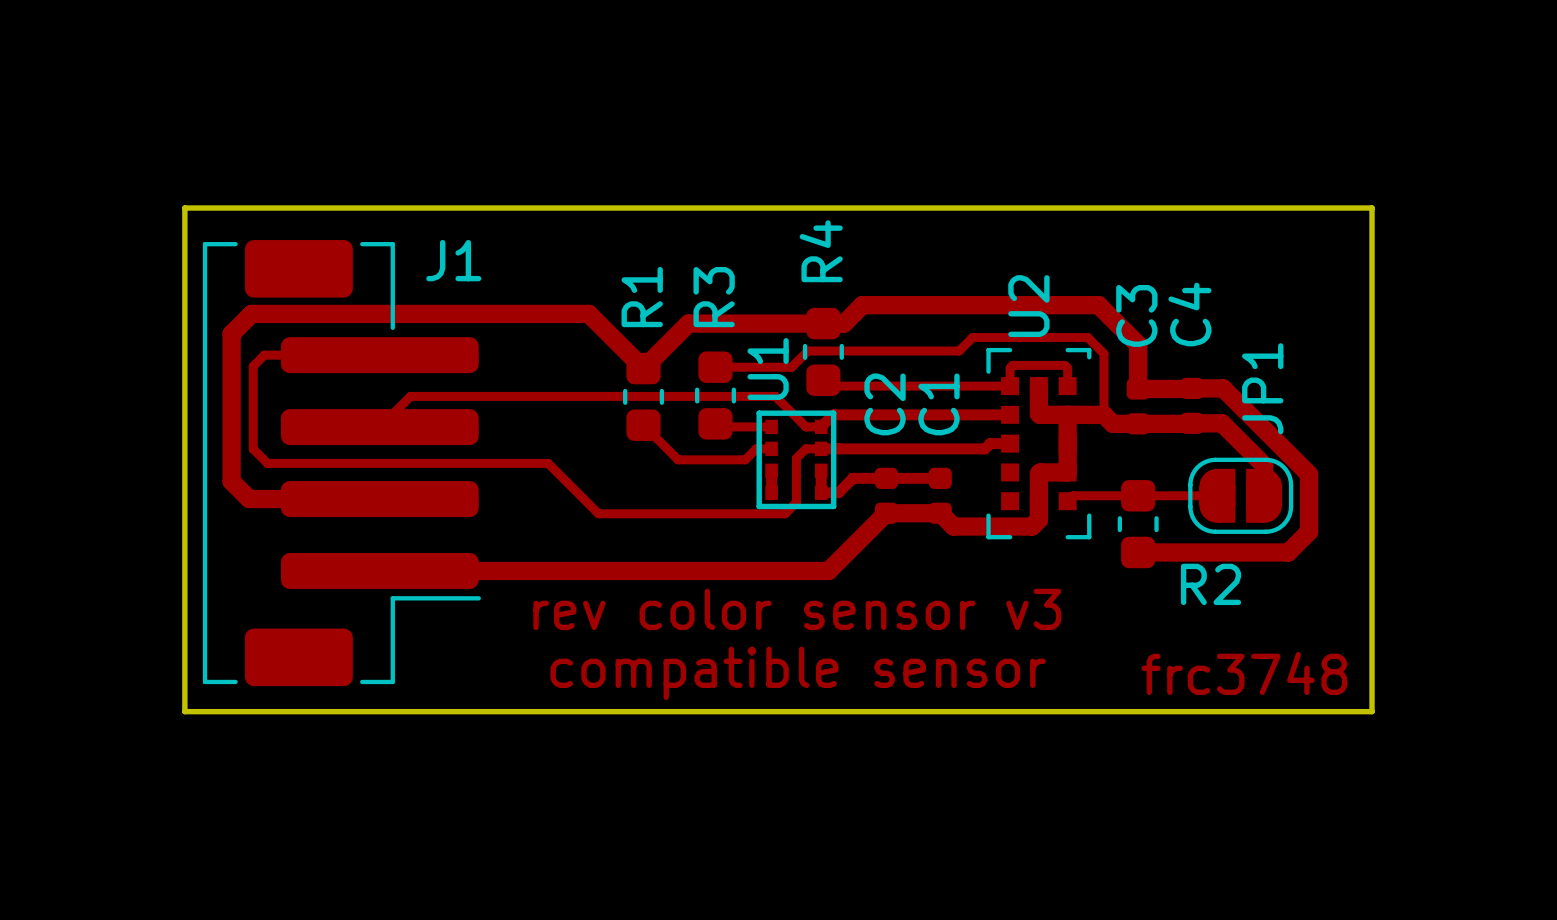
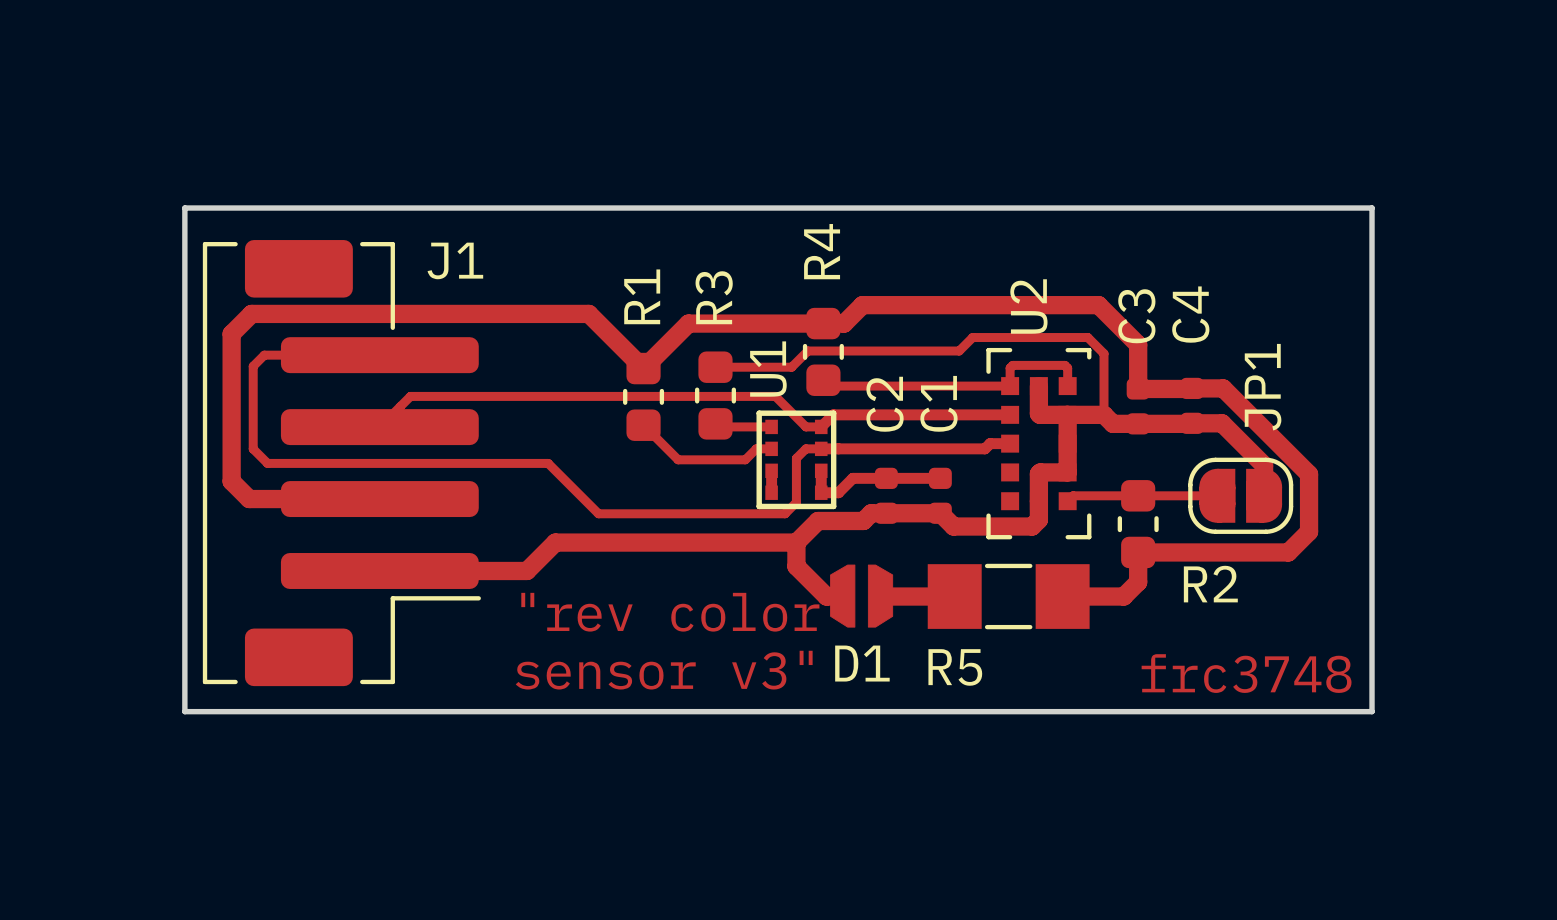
top track: (886, 513) (828, 570) (526, 570) -> (796, 542) (555, 542) (526, 570)
top track: none -> (886, 513) (871, 513) (863, 520) (818, 520) (796, 542)
top track: none -> (796, 542) (796, 566) (826, 596) (836, 596)
top track: none -> (1138, 552) (1138, 582) (1123, 596) (1062, 596)
D1: none -> (861, 596)
top track: none -> (886, 596) (954, 596)
R5: none -> (1008, 596)
text: rev color sensor v3 (797, 609) -> none
text: none -> "rev color (670, 612)
text: none -> sensor v3" (664, 670)
text: compatible sensor (798, 673) -> none

